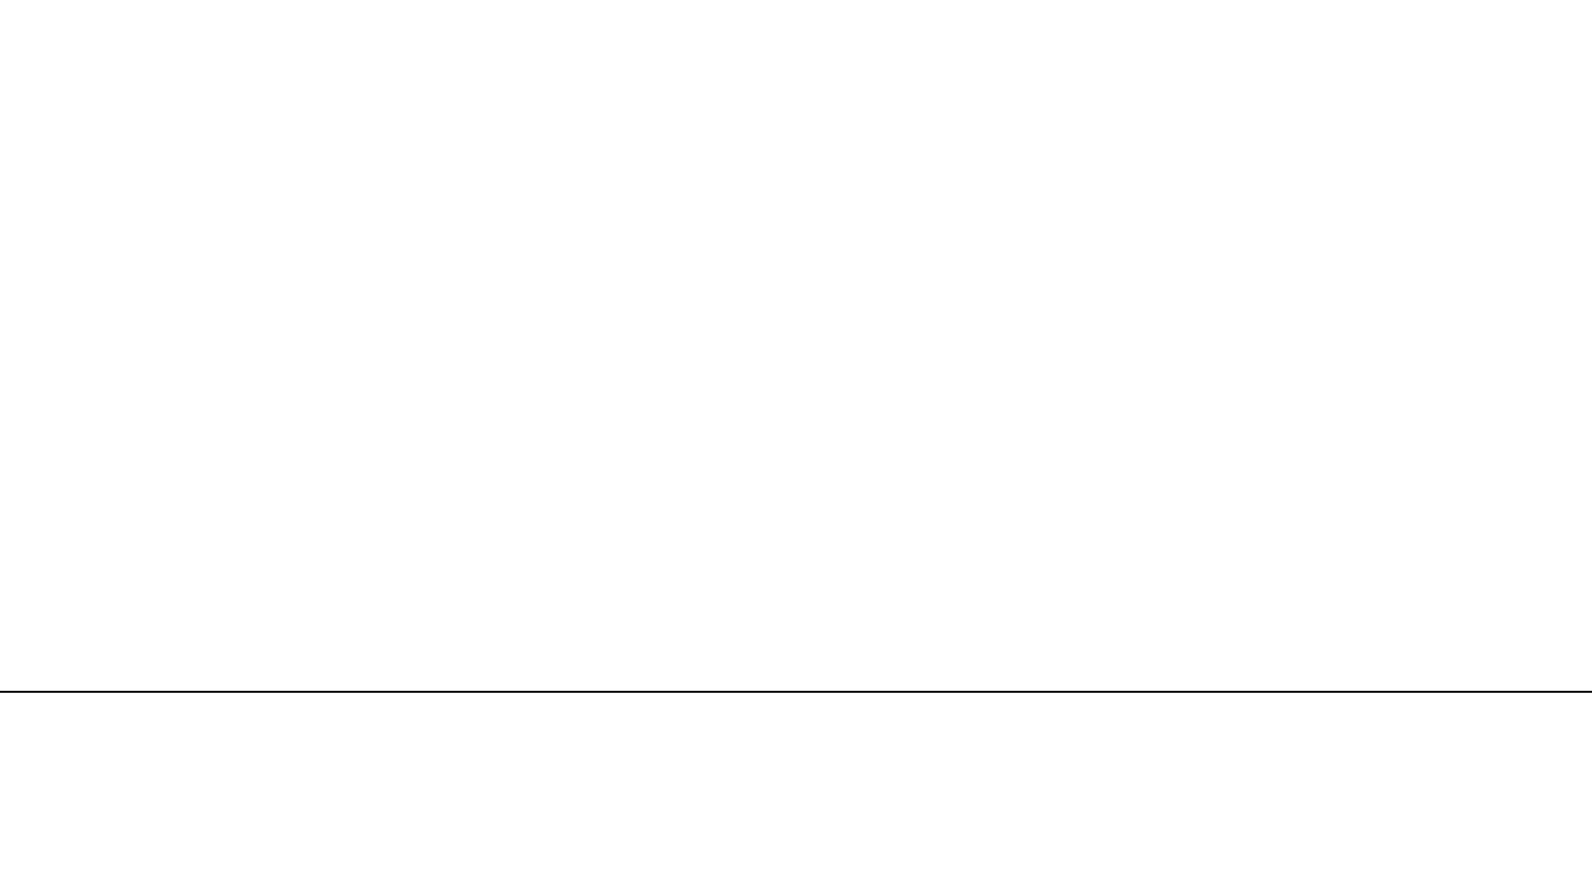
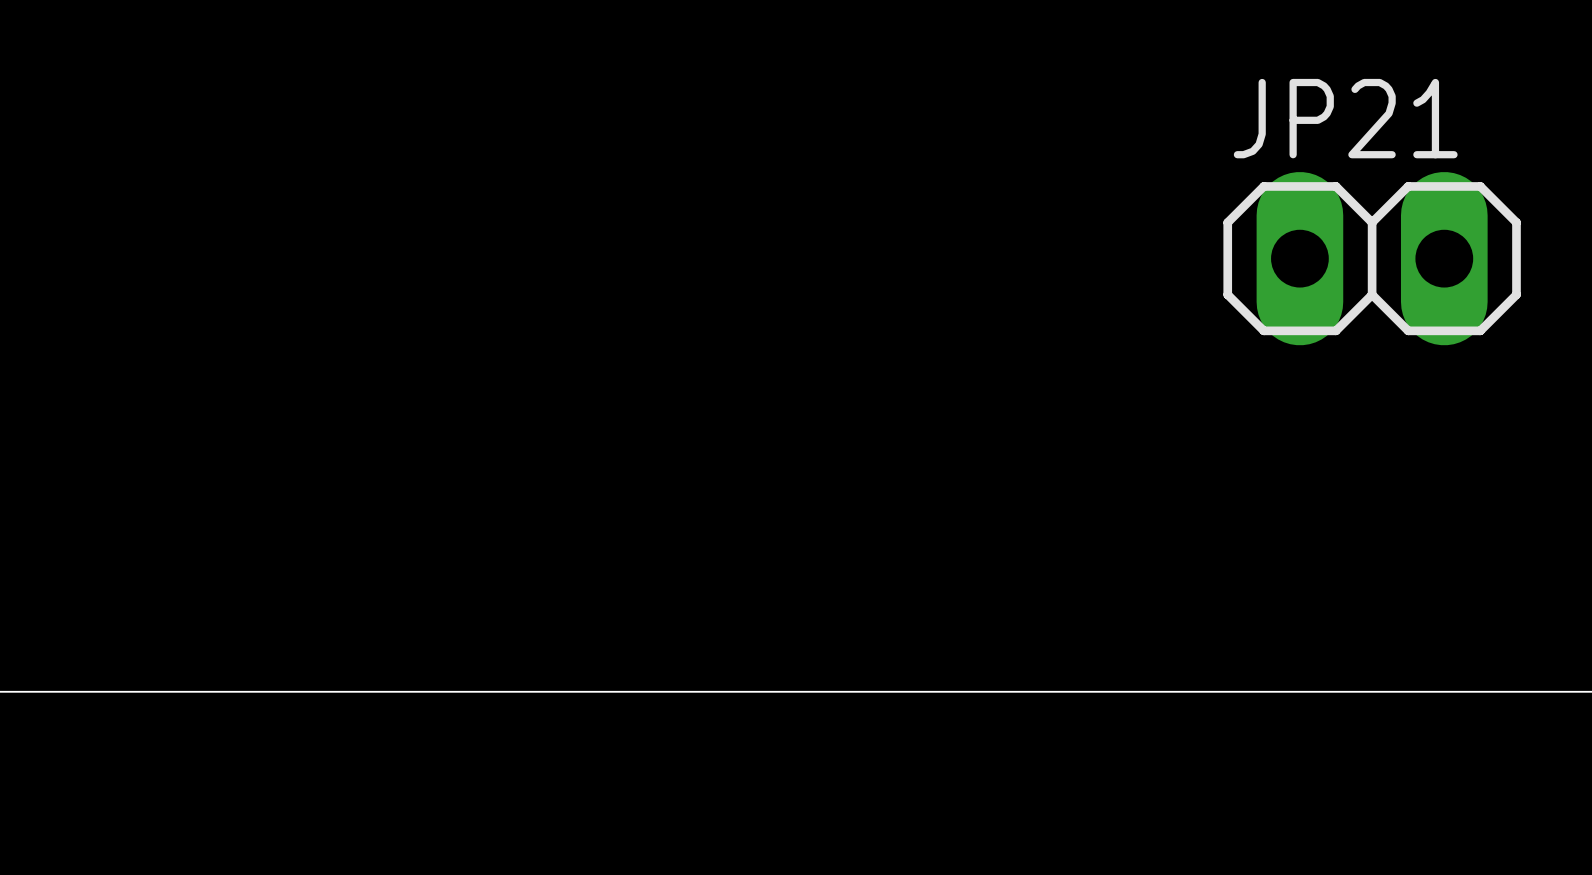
JP21: none -> (1372, 258)

